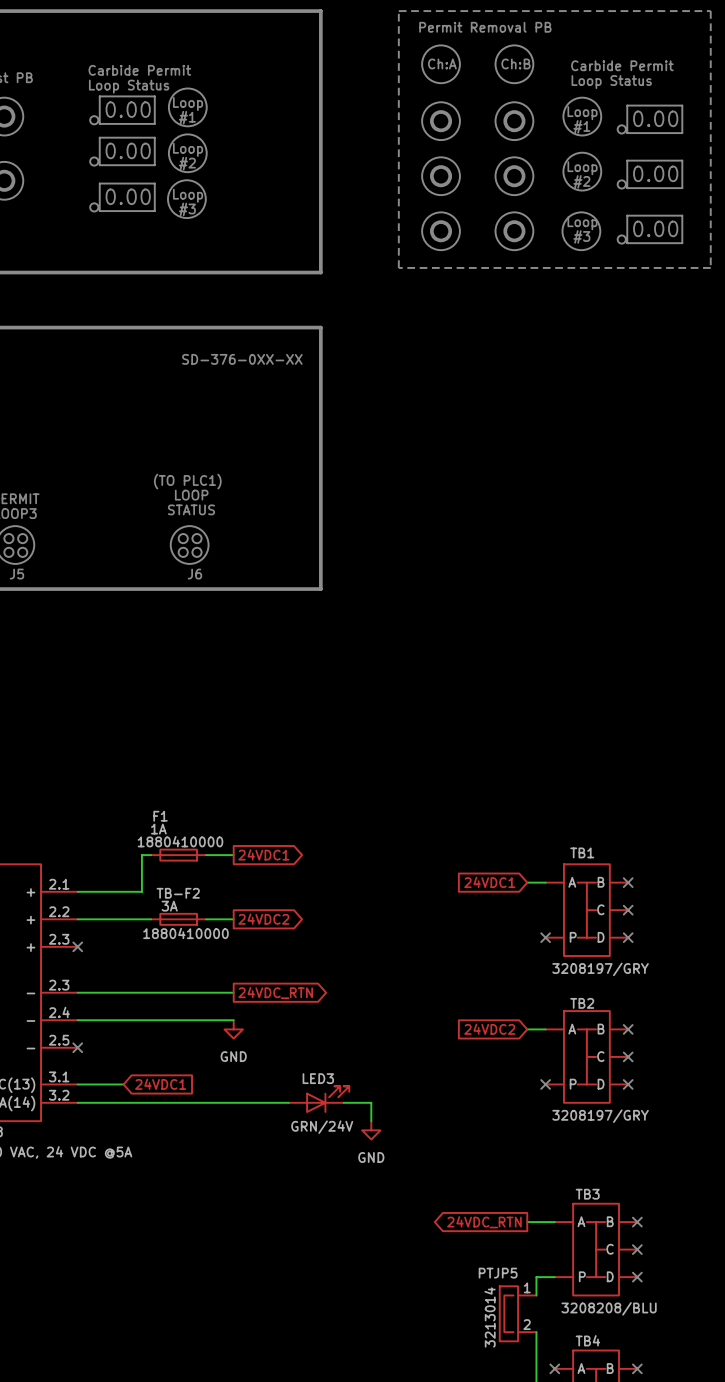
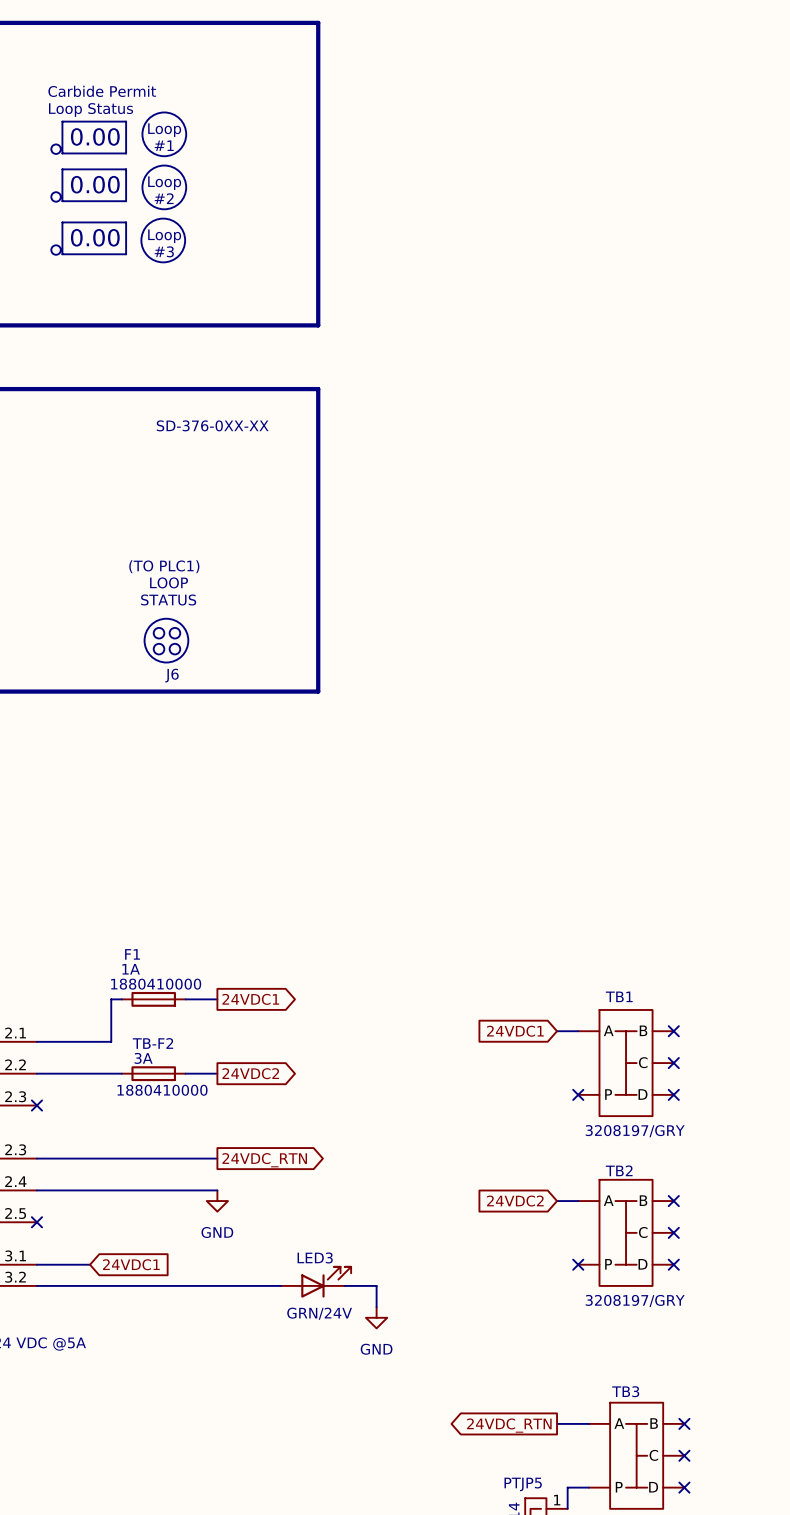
line: (398, 11) (710, 11) (710, 267) (398, 267) (398, 11) -> none
text: Permit Removal PB (485, 27) -> none
drawing: [422, 45, 460, 84] -> none
drawing: [495, 45, 534, 84] -> none
text: Ch:A (442, 63) -> none
text: Ch:B (515, 63) -> none
text: Carbide Permit (622, 65) -> none
text: Loop Status (611, 82) -> none
drawing: [563, 97, 602, 136] -> none
drawing: [422, 102, 460, 141] -> none
drawing: [495, 102, 534, 141] -> none
line: (627, 105) (627, 133) (682, 133) (682, 105) (627, 105) -> none
text: Loop (582, 113) -> none
text: 0.00 (655, 118) -> none
drawing: [617, 125, 626, 134] -> none
text: #1 (581, 126) -> none
drawing: [563, 152, 602, 191] -> none
drawing: [422, 157, 460, 196] -> none
drawing: [495, 157, 534, 196] -> none
line: (627, 160) (682, 160) (682, 188) (627, 188) (627, 160) -> none
text: Loop (582, 168) -> none
text: 0.00 (655, 173) -> none
drawing: [617, 180, 626, 189] -> none
text: #2 (581, 181) -> none
drawing: [422, 212, 460, 251] -> none
drawing: [495, 212, 534, 251] -> none
drawing: [562, 212, 601, 251] -> none
line: (627, 215) (627, 243) (682, 243) (682, 215) (627, 215) -> none
text: Loop (582, 223) -> none
text: 0.00 (655, 228) -> none
drawing: [617, 235, 626, 244] -> none
text: #3 (581, 236) -> none

